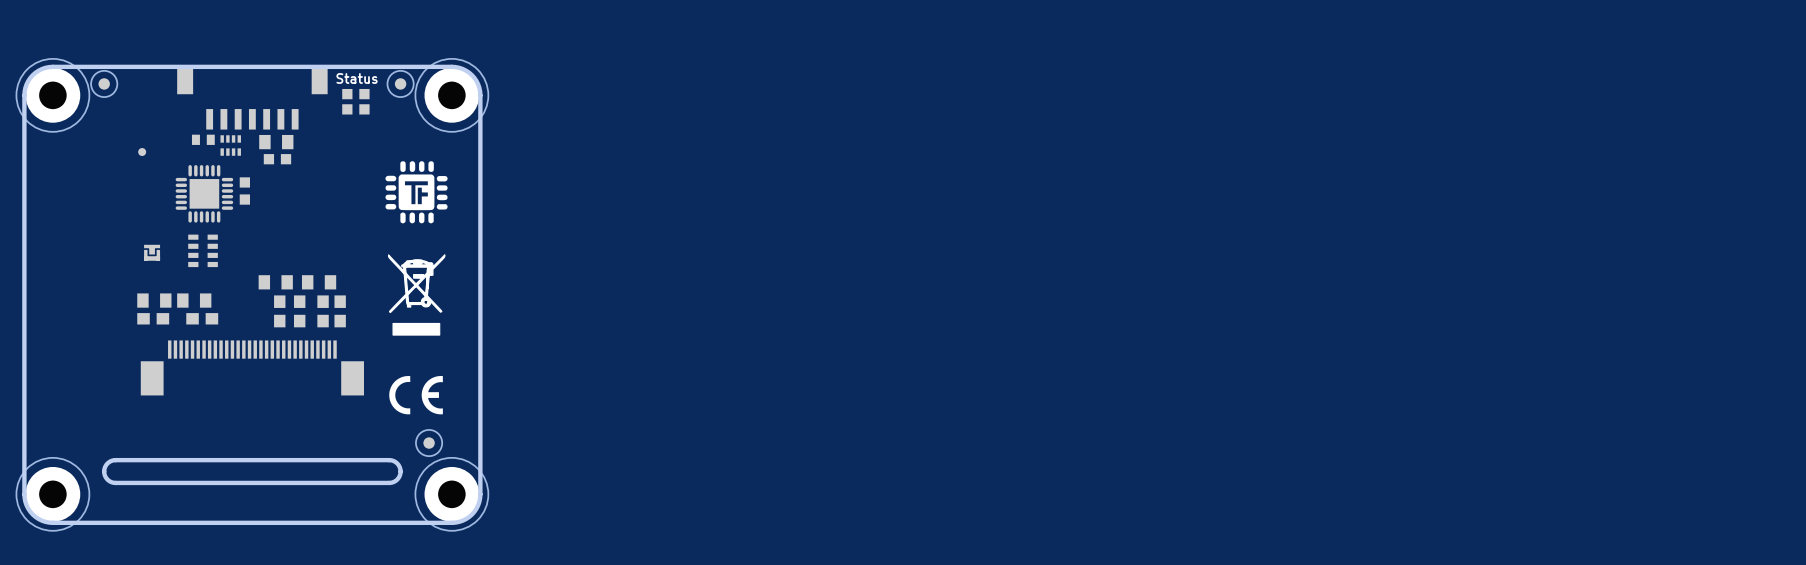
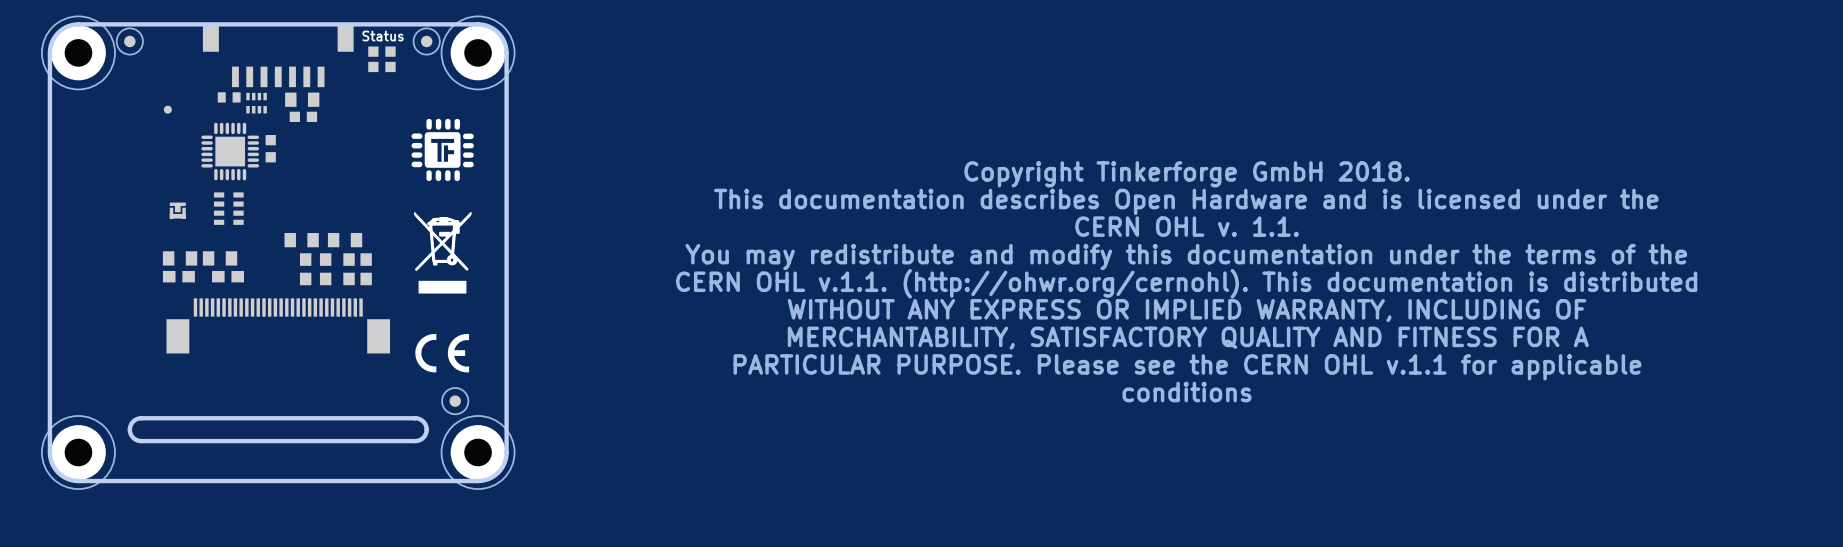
text: none -> Copyright Tinkerforge GmbH 2018. (1187, 174)
text: none -> This documentation describes Open Hardware and is licensed under the (1186, 201)
text: none -> CERN OHL v. 1.1. (1187, 226)
text: none -> You may redistribute and modify this documentation under the terms of the (1186, 257)
text: none -> CERN OHL v.1.1. (http://ohwr.org/cernohl). This documentation is distributed (1186, 283)
text: none -> WITHOUT ANY EXPRESS OR IMPLIED WARRANTY, INCLUDING OF (1187, 310)
text: none -> MERCHANTABILITY, SATISFACTORY QUALITY AND FITNESS FOR A (1188, 338)
text: none -> PARTICULAR PURPOSE. Please see the CERN OHL v.1.1 for applicable (1187, 367)
text: none -> conditions (1187, 392)

